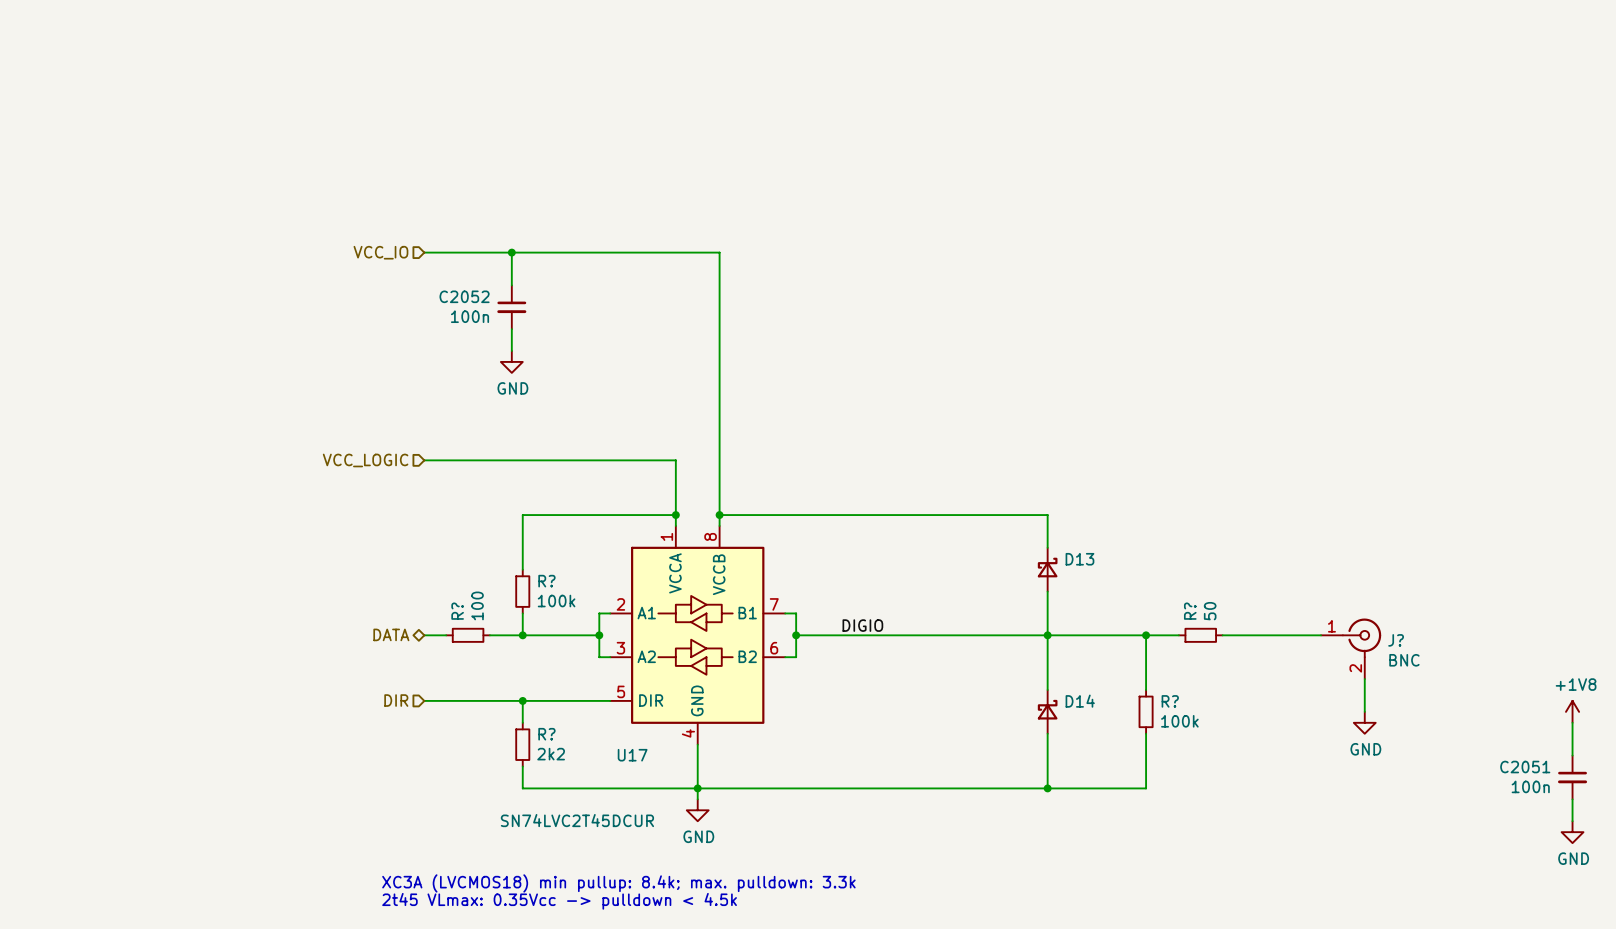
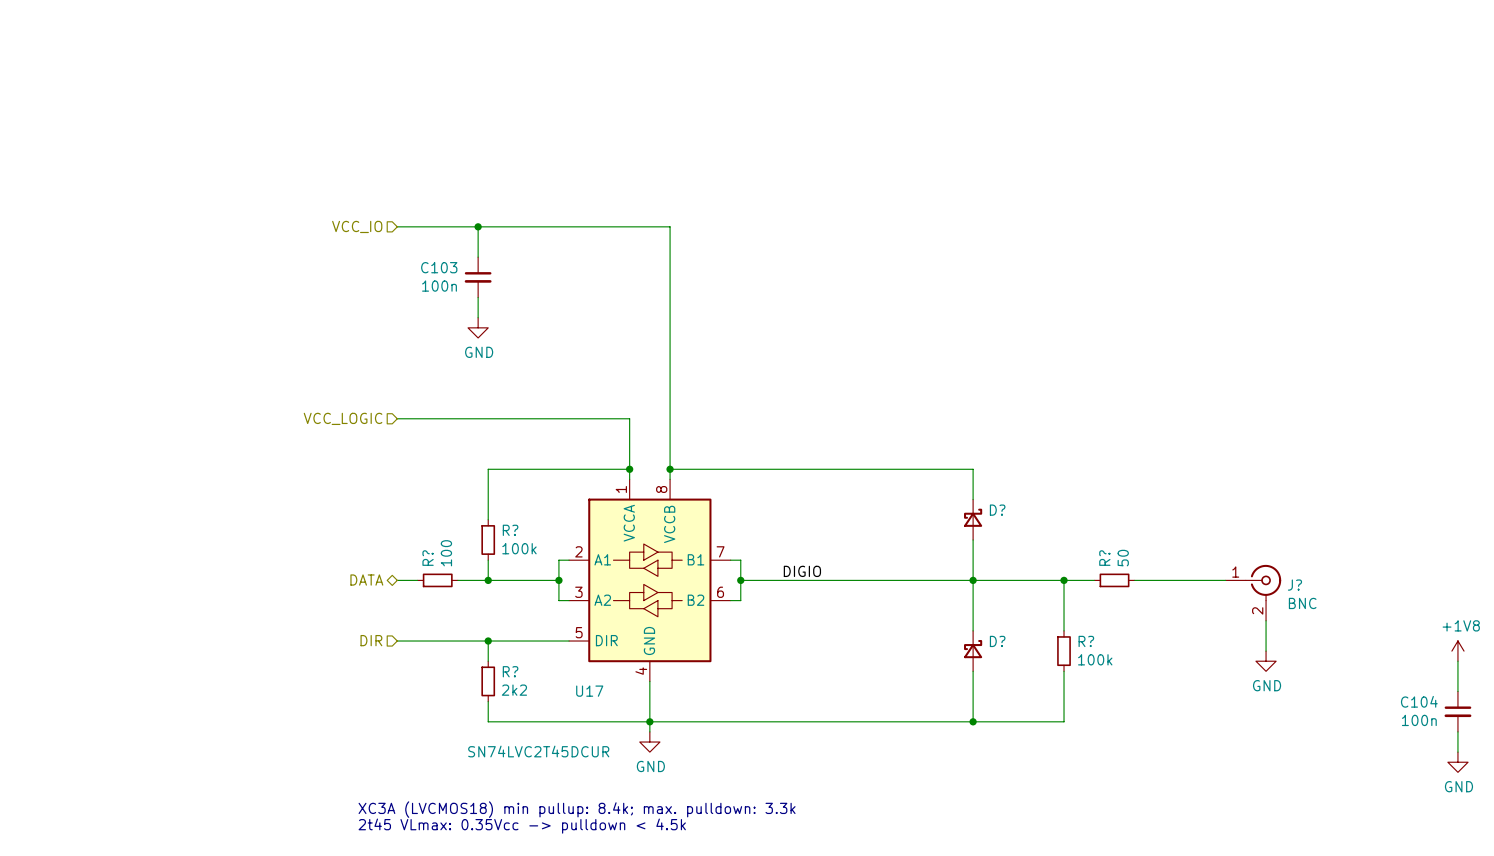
C2052 name: C2052 (464, 296) -> C103 (439, 267)
D13 name: D13 (1079, 559) -> D? (997, 510)
D14 name: D14 (1080, 701) -> D? (997, 641)
C2051 name: C2051 (1525, 767) -> C104 (1419, 701)

